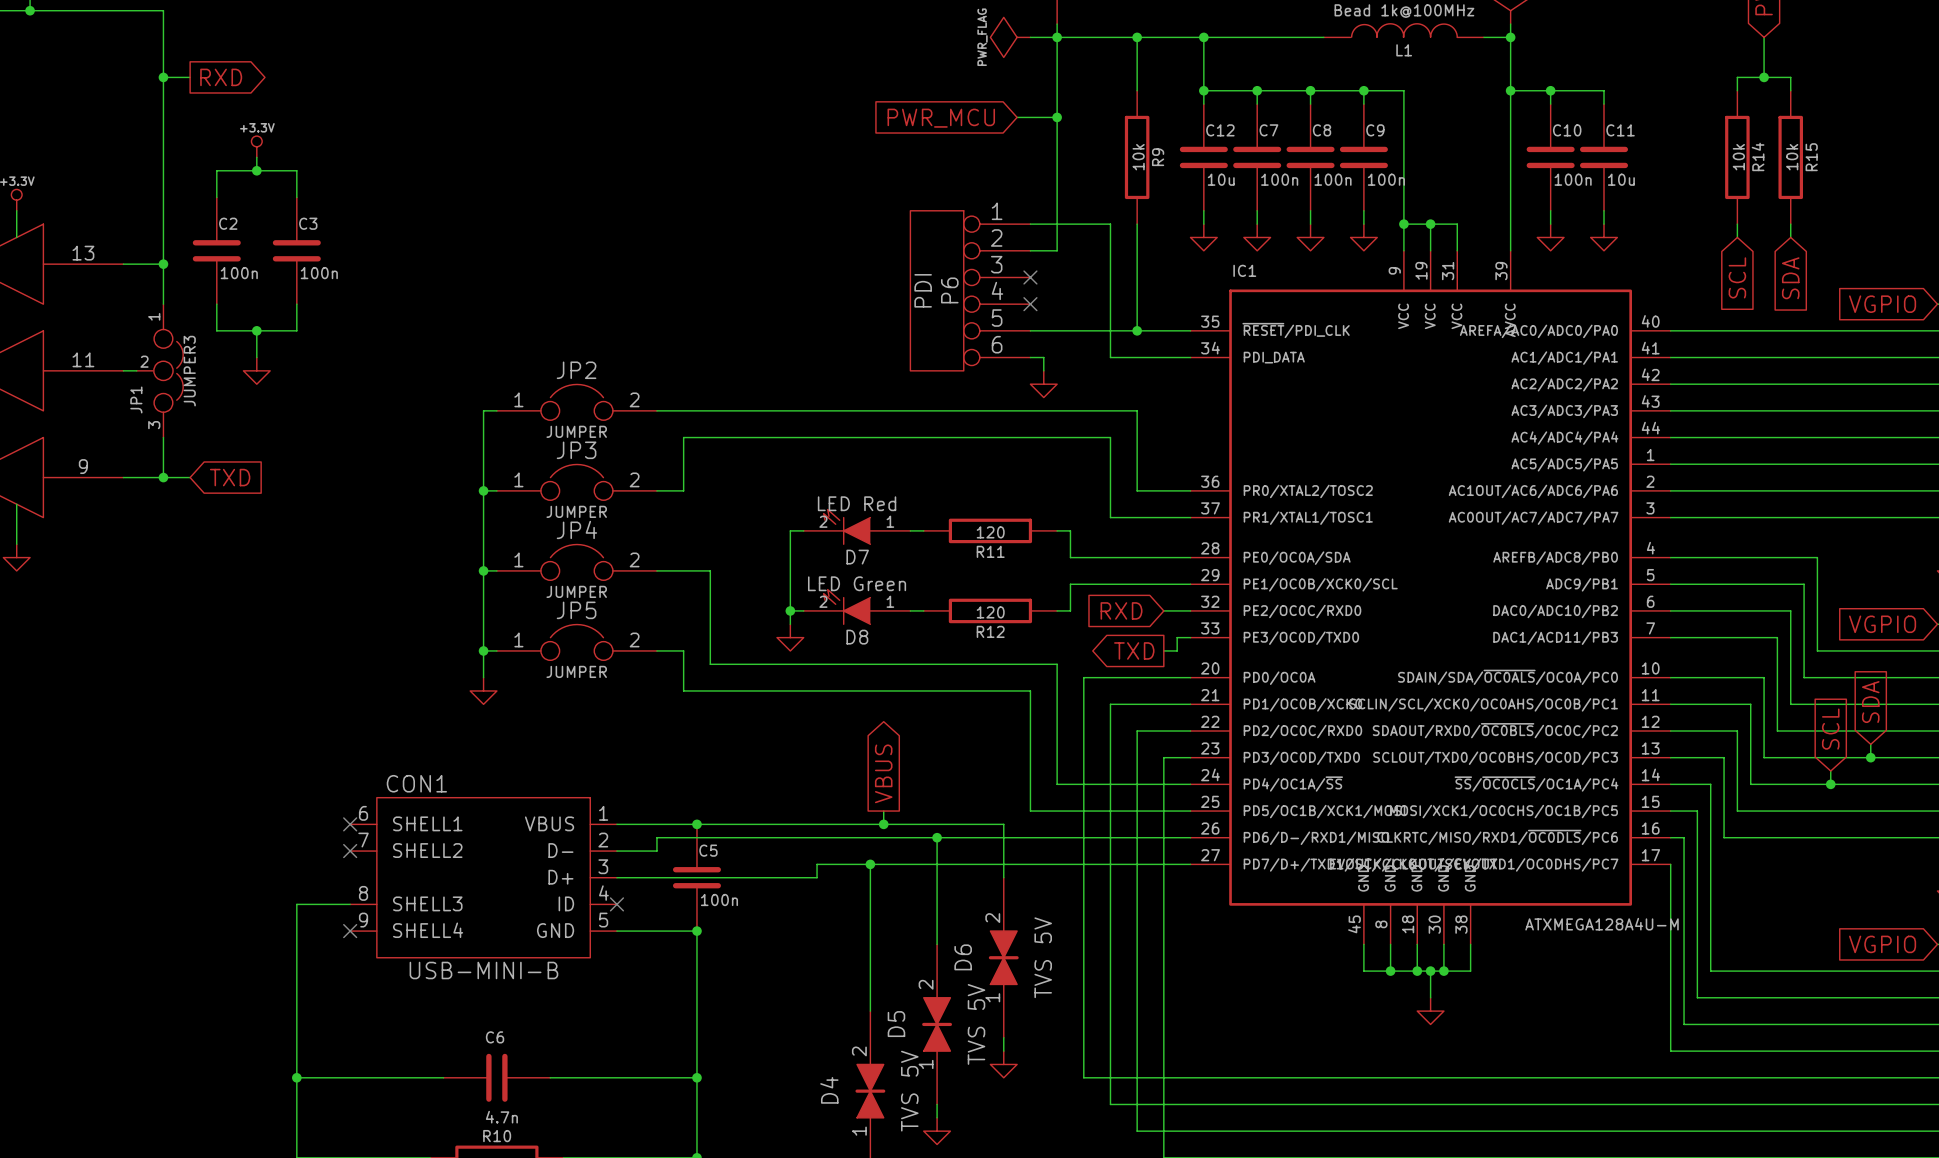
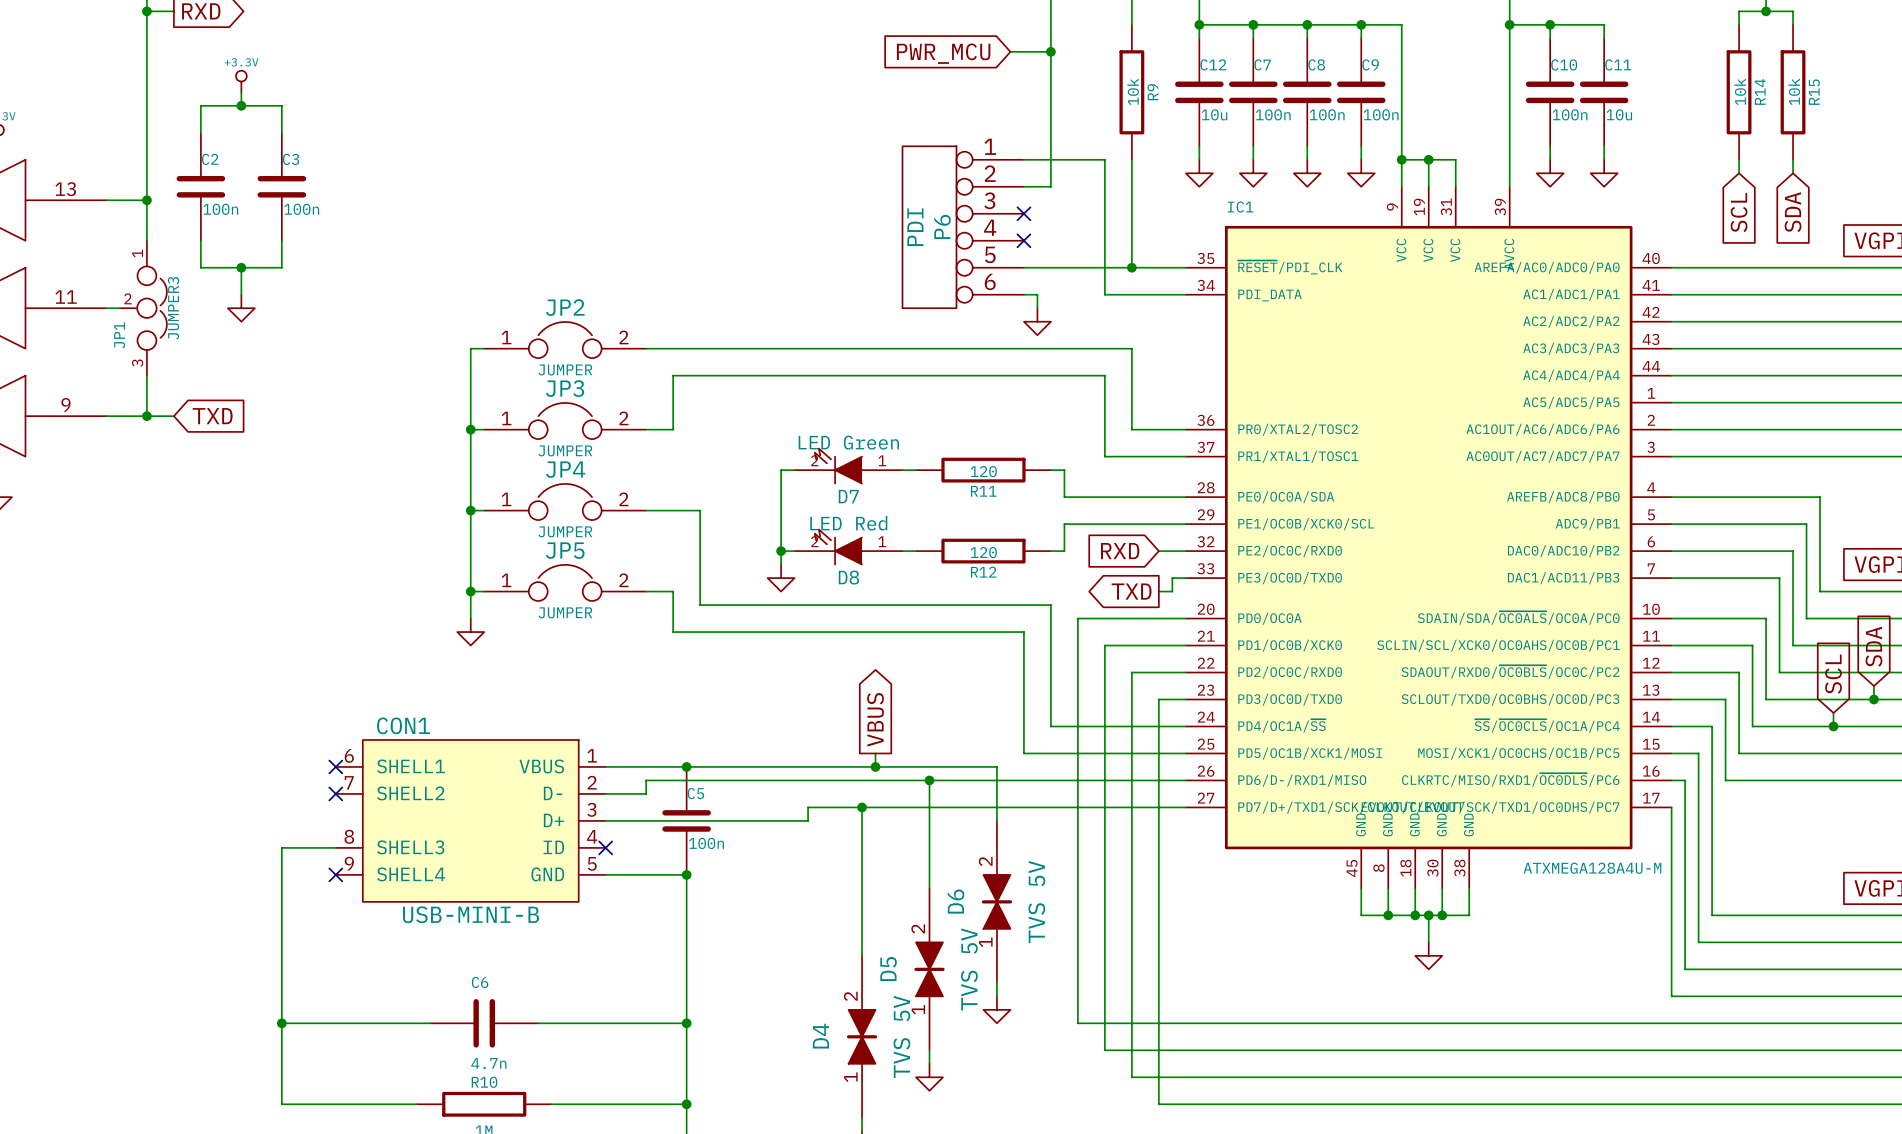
D7 value: LED Red (857, 503) -> LED Green (848, 442)
D8 value: LED Green (857, 583) -> LED Red (848, 523)

